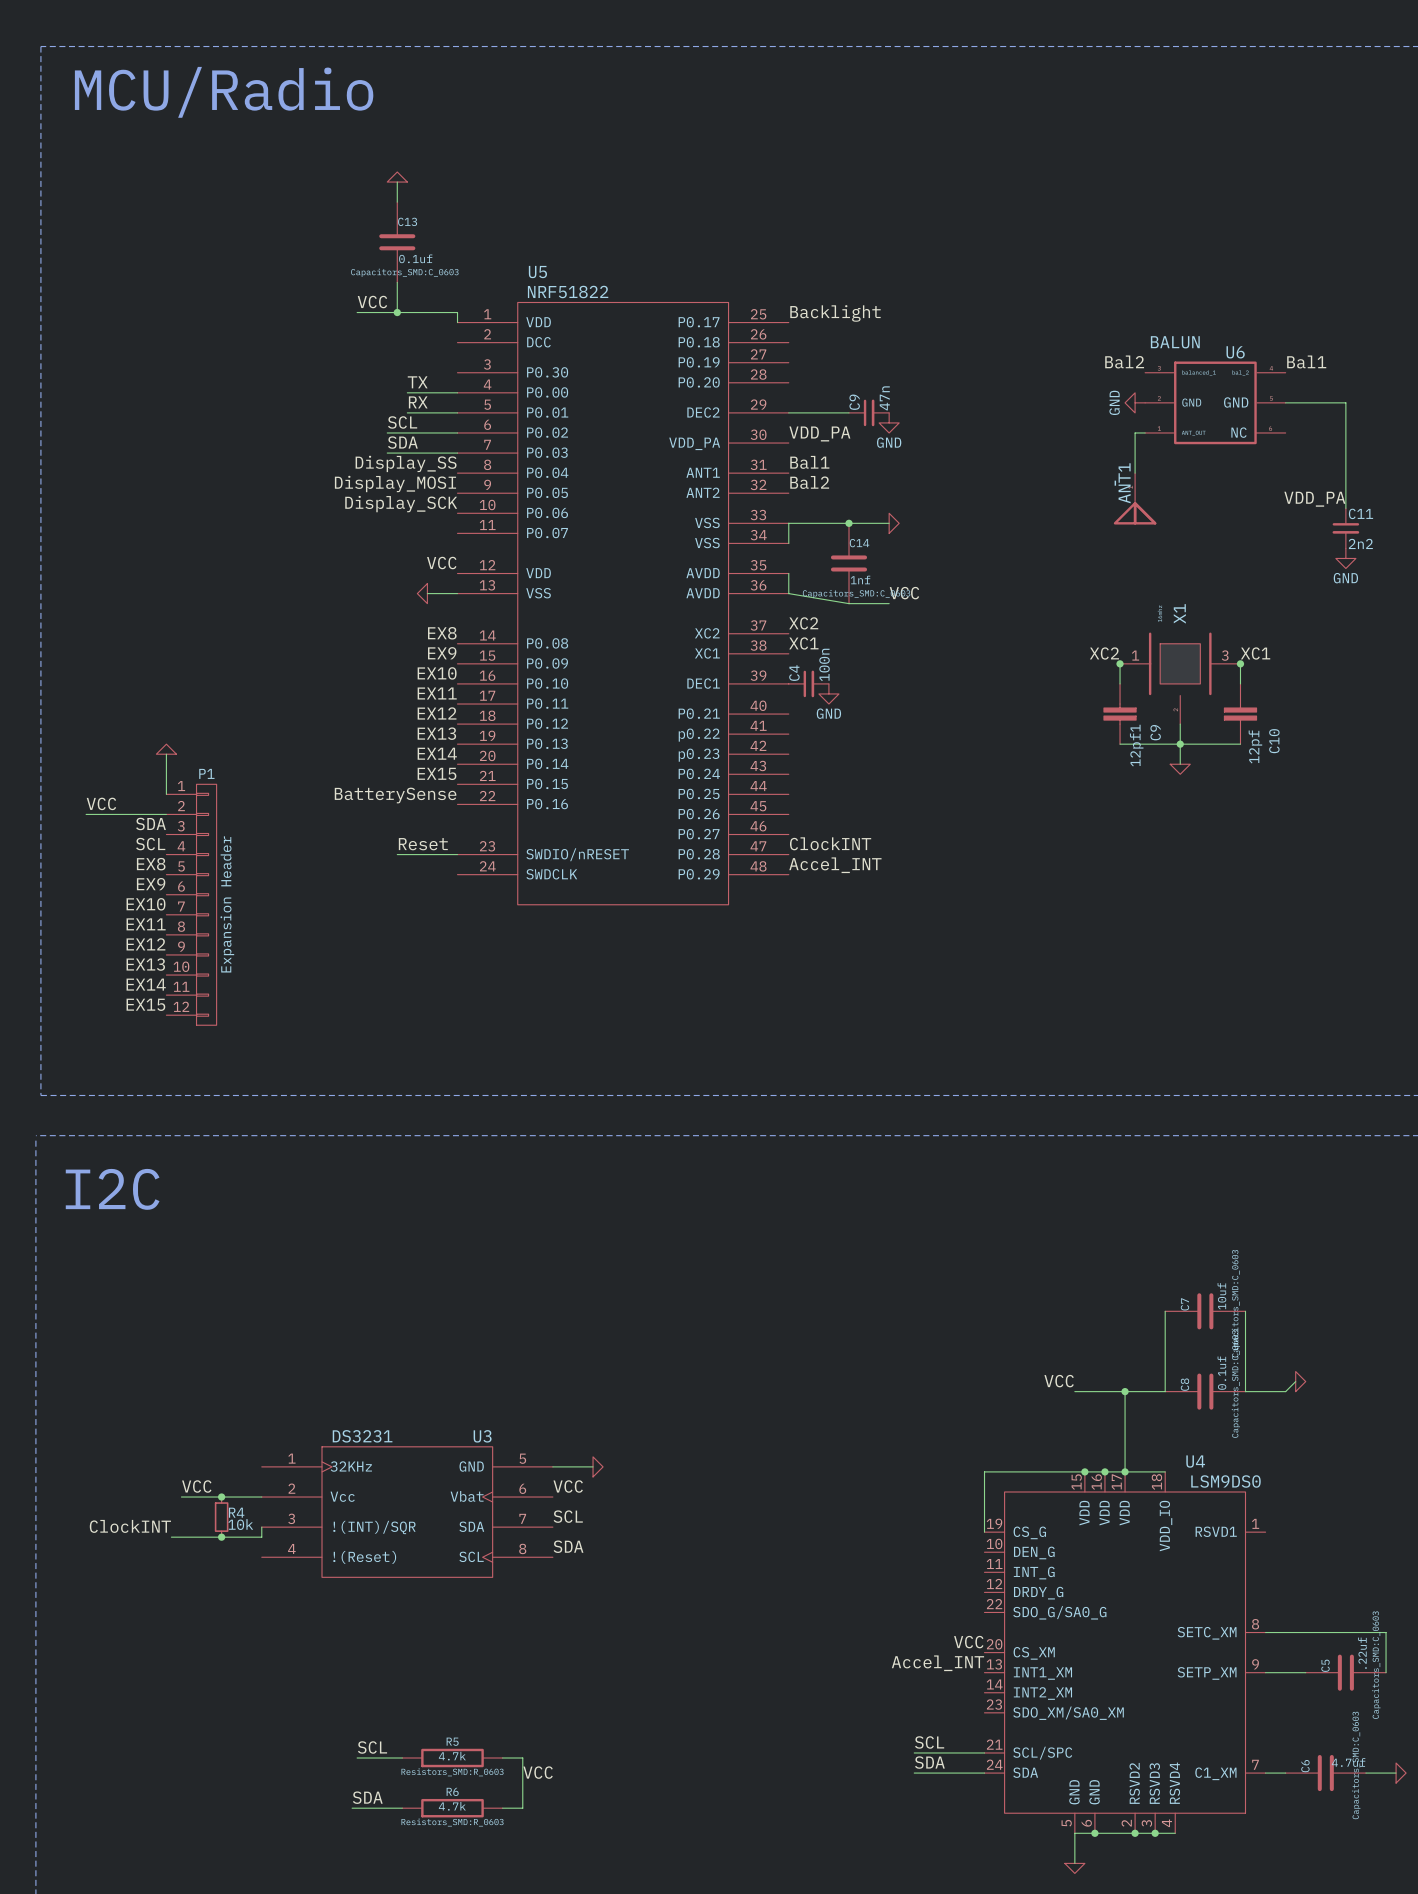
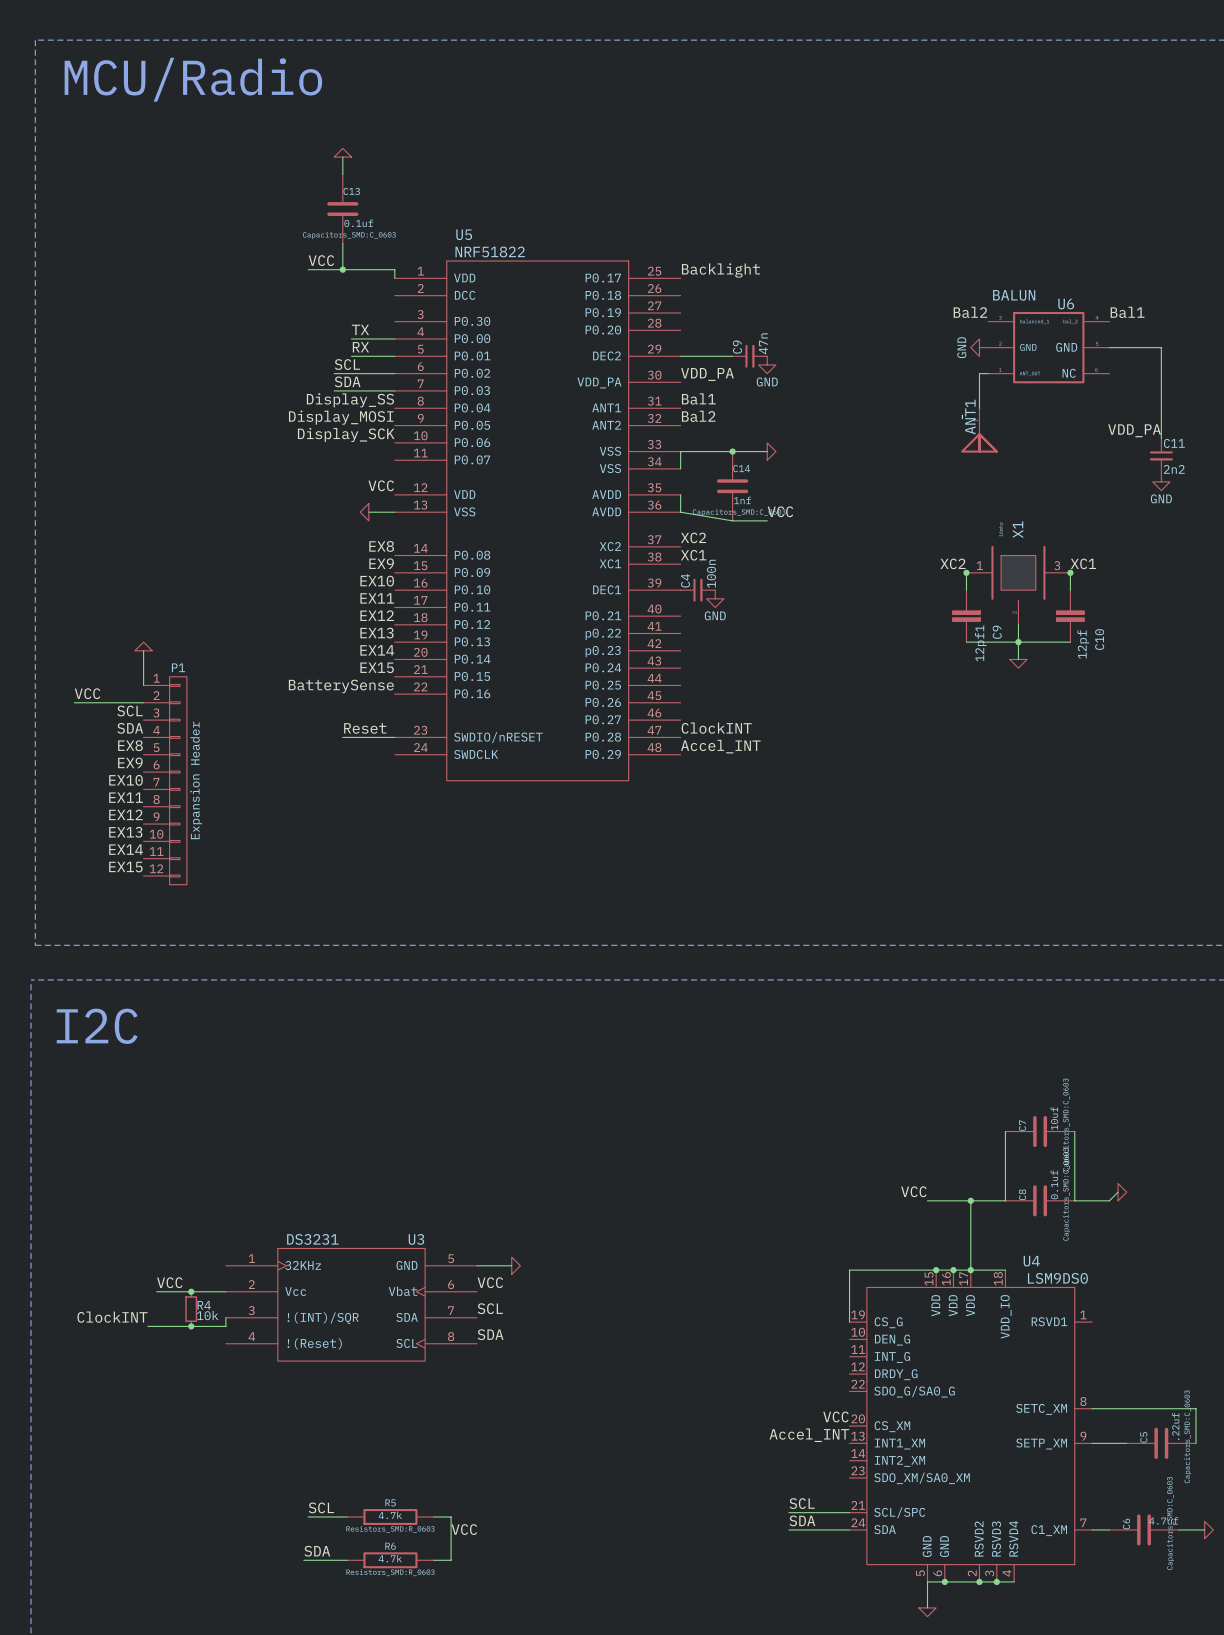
label: SDA (151, 824) -> SCL (130, 711)
label: SCL (150, 844) -> SDA (130, 728)

